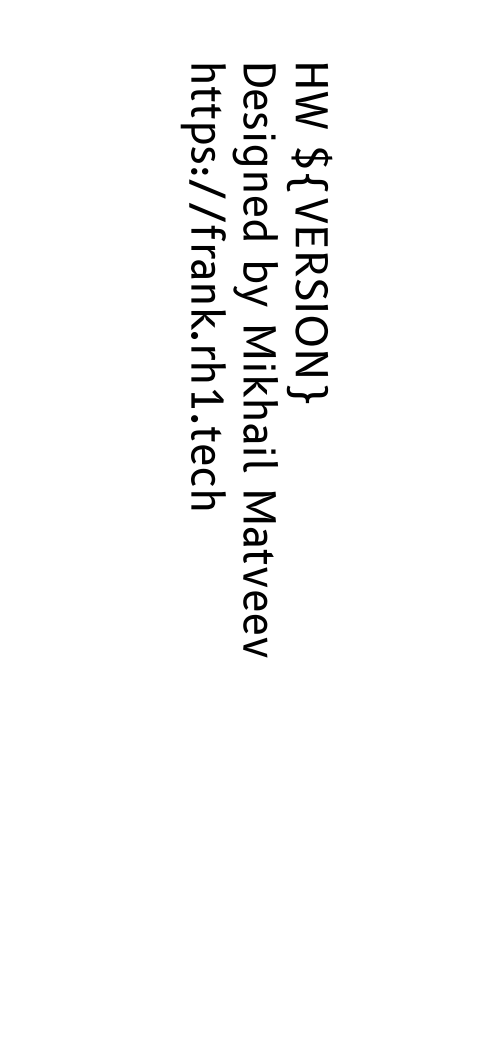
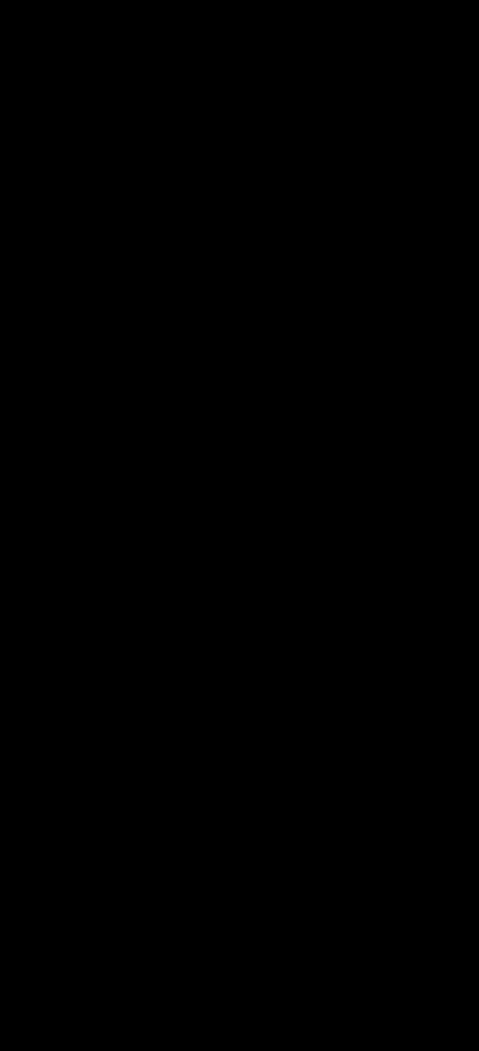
text: HW ${VERSION} (309, 233) -> none
text: https://frank.rh1.tech (203, 286) -> none
text: Designed by Mikhail Matveev (255, 360) -> none

